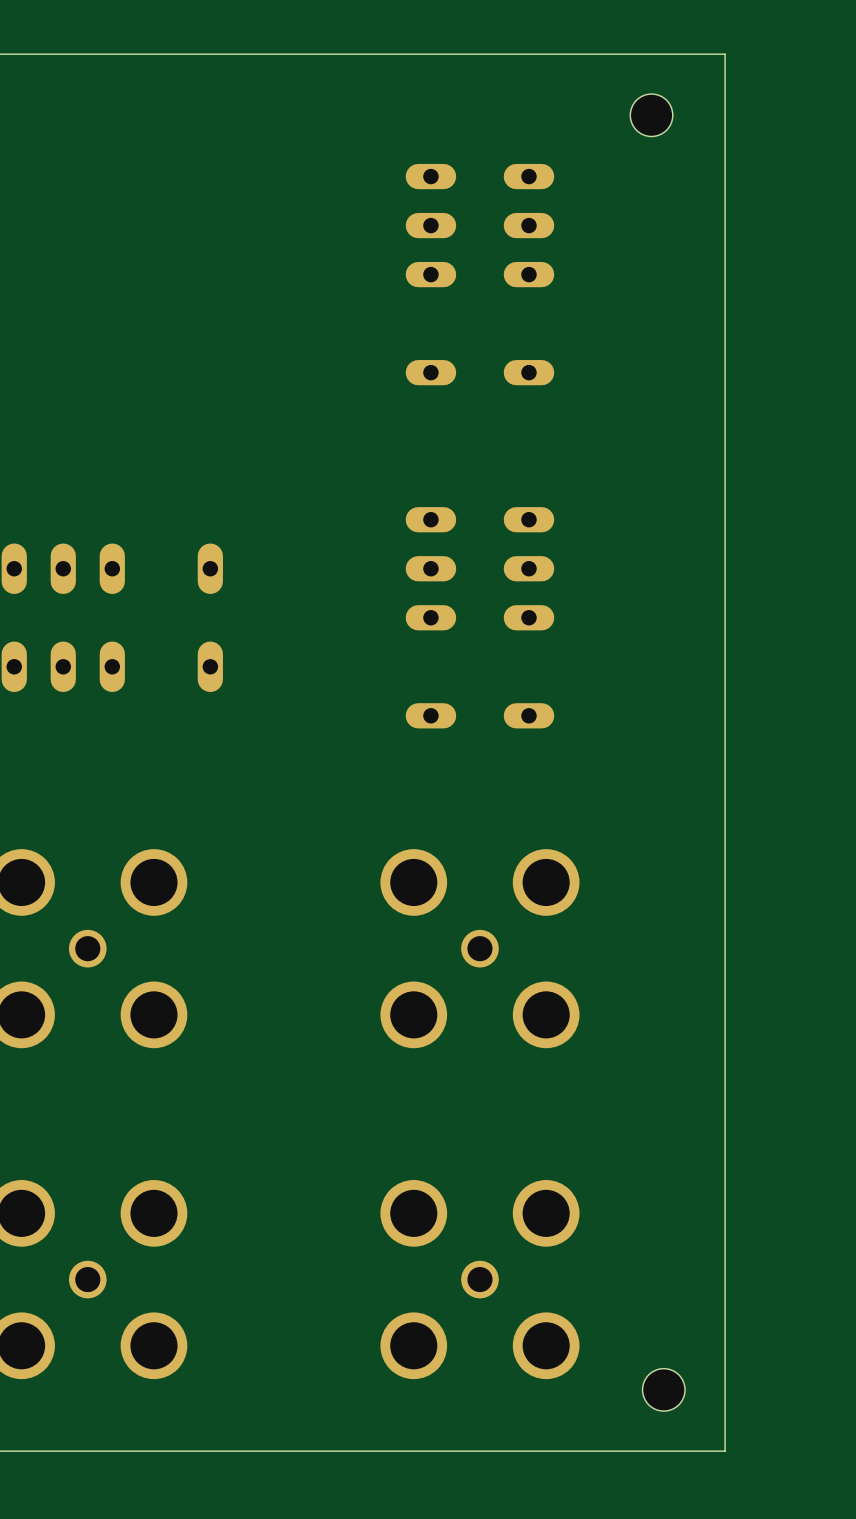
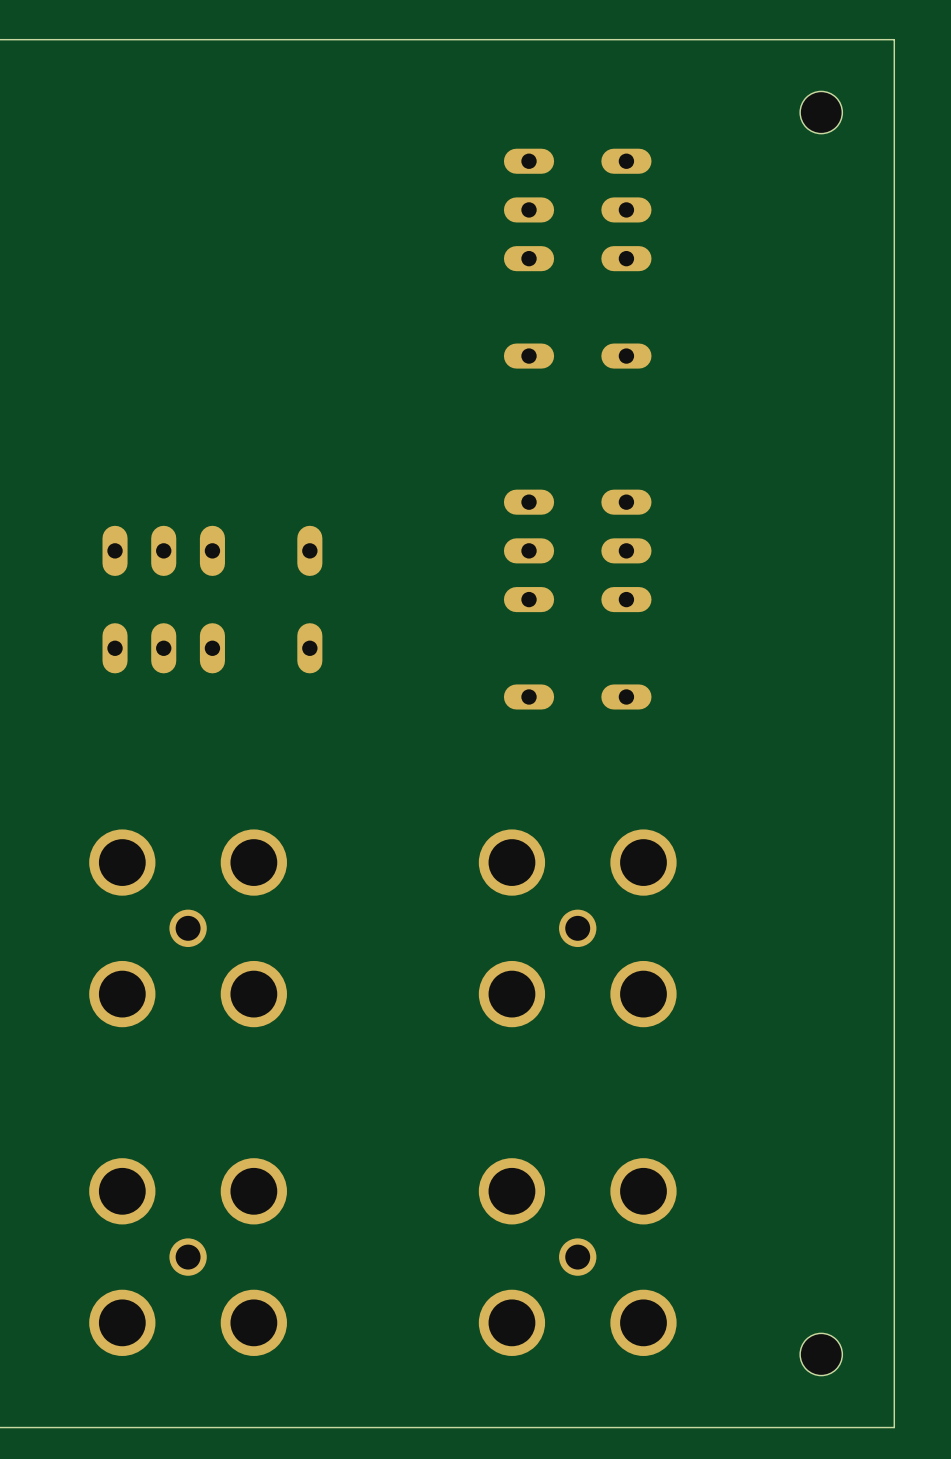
board edge: (725, 54) (725, 1451) -> (821, 39) (894, 39) (894, 1427) (821, 1427)
hole position: (651, 115) -> (821, 112)
hole position: (663, 1389) -> (821, 1354)

